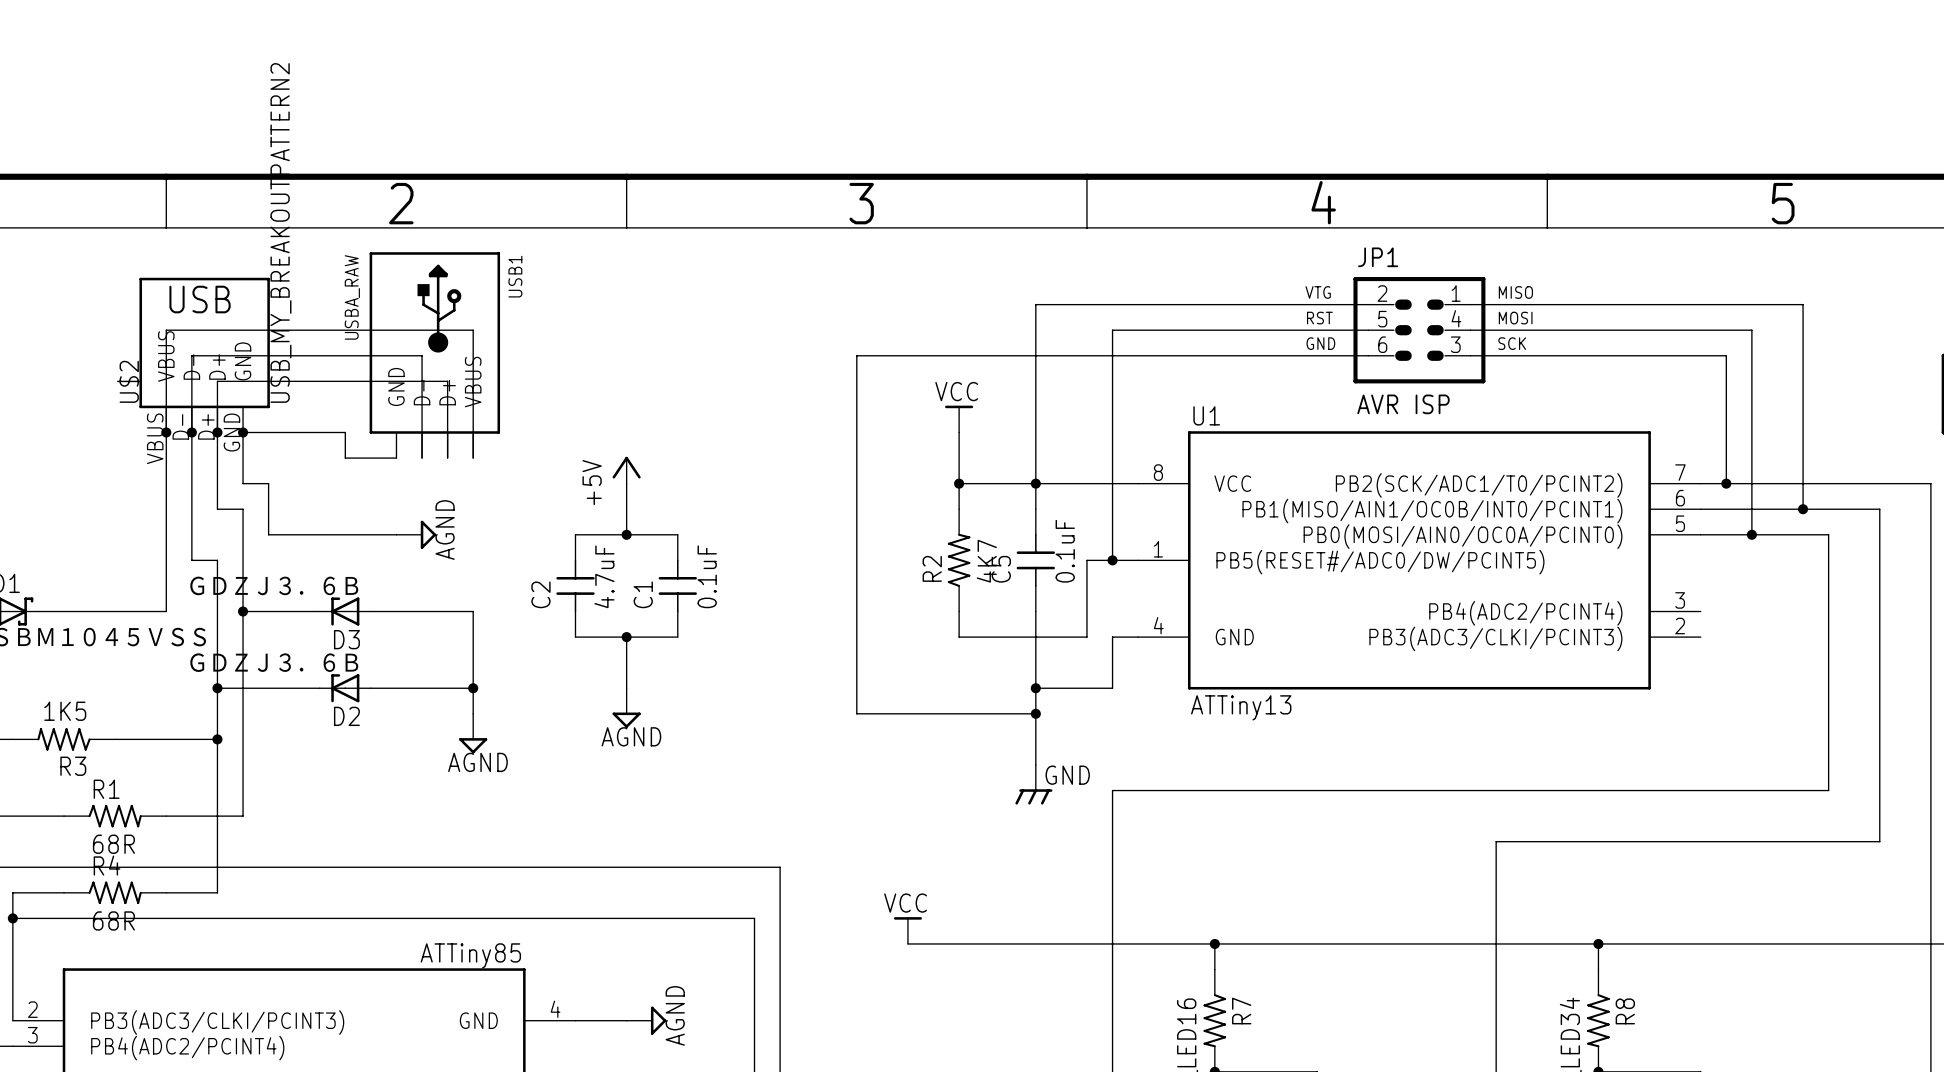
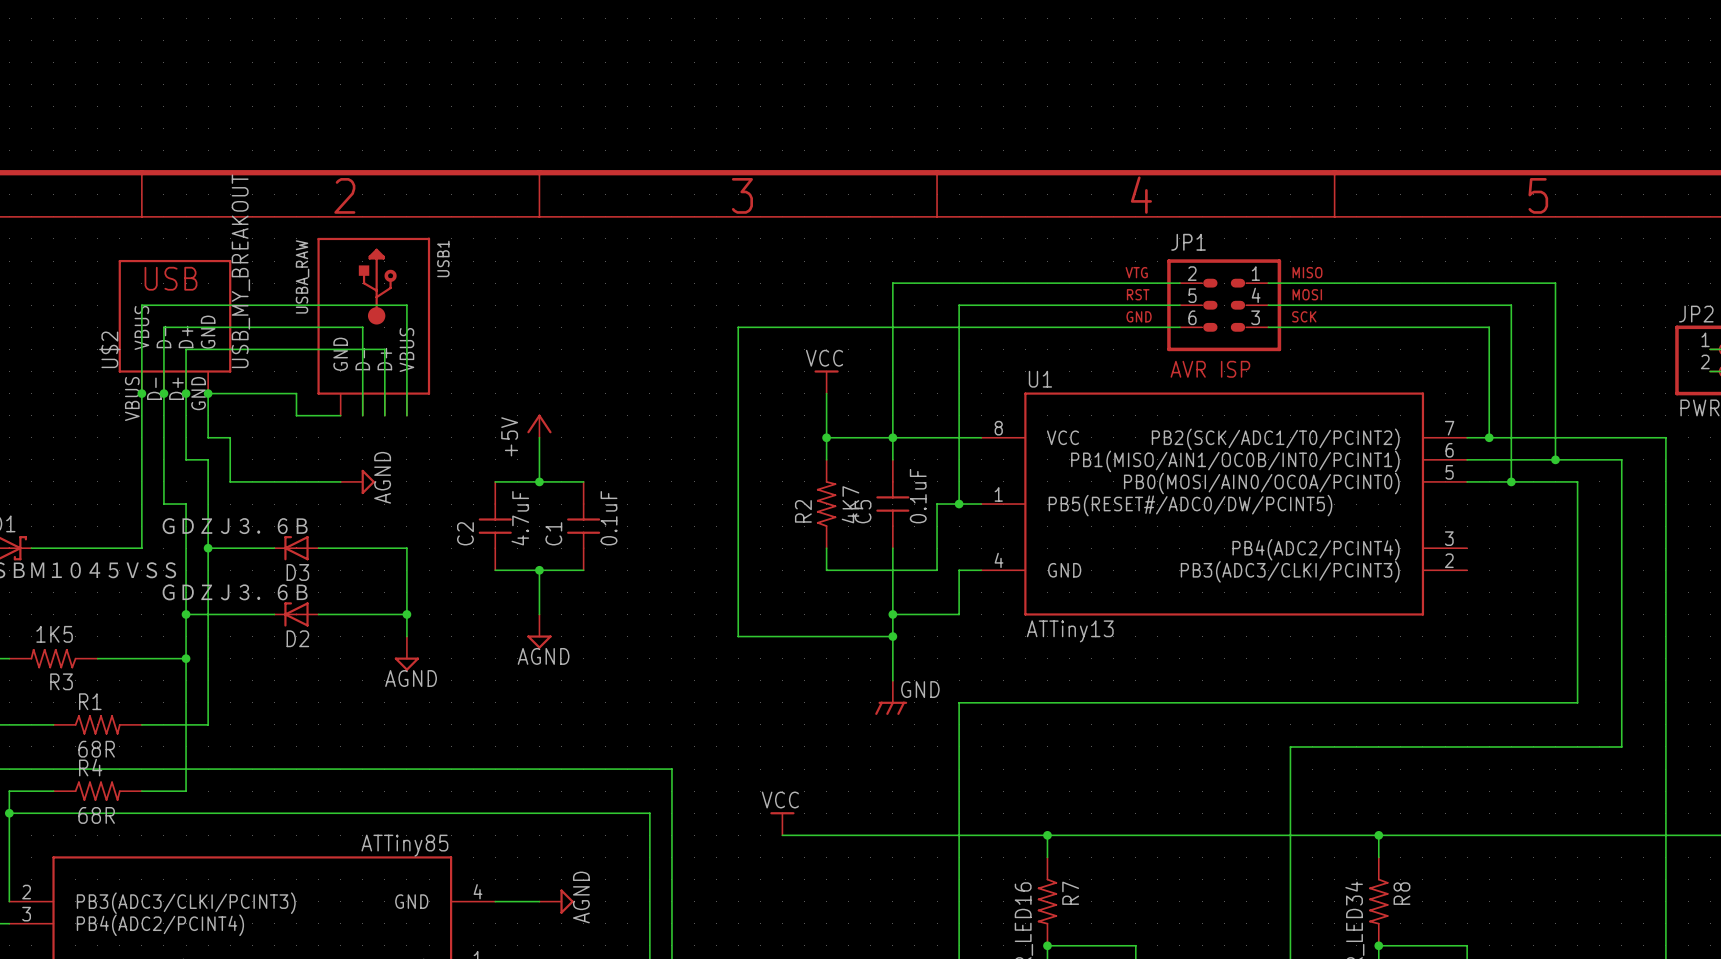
U$2 value: USB_MY_BREAKOUTPATTERN2 (280, 232) -> USB_MY_BREAKOUT (240, 271)

